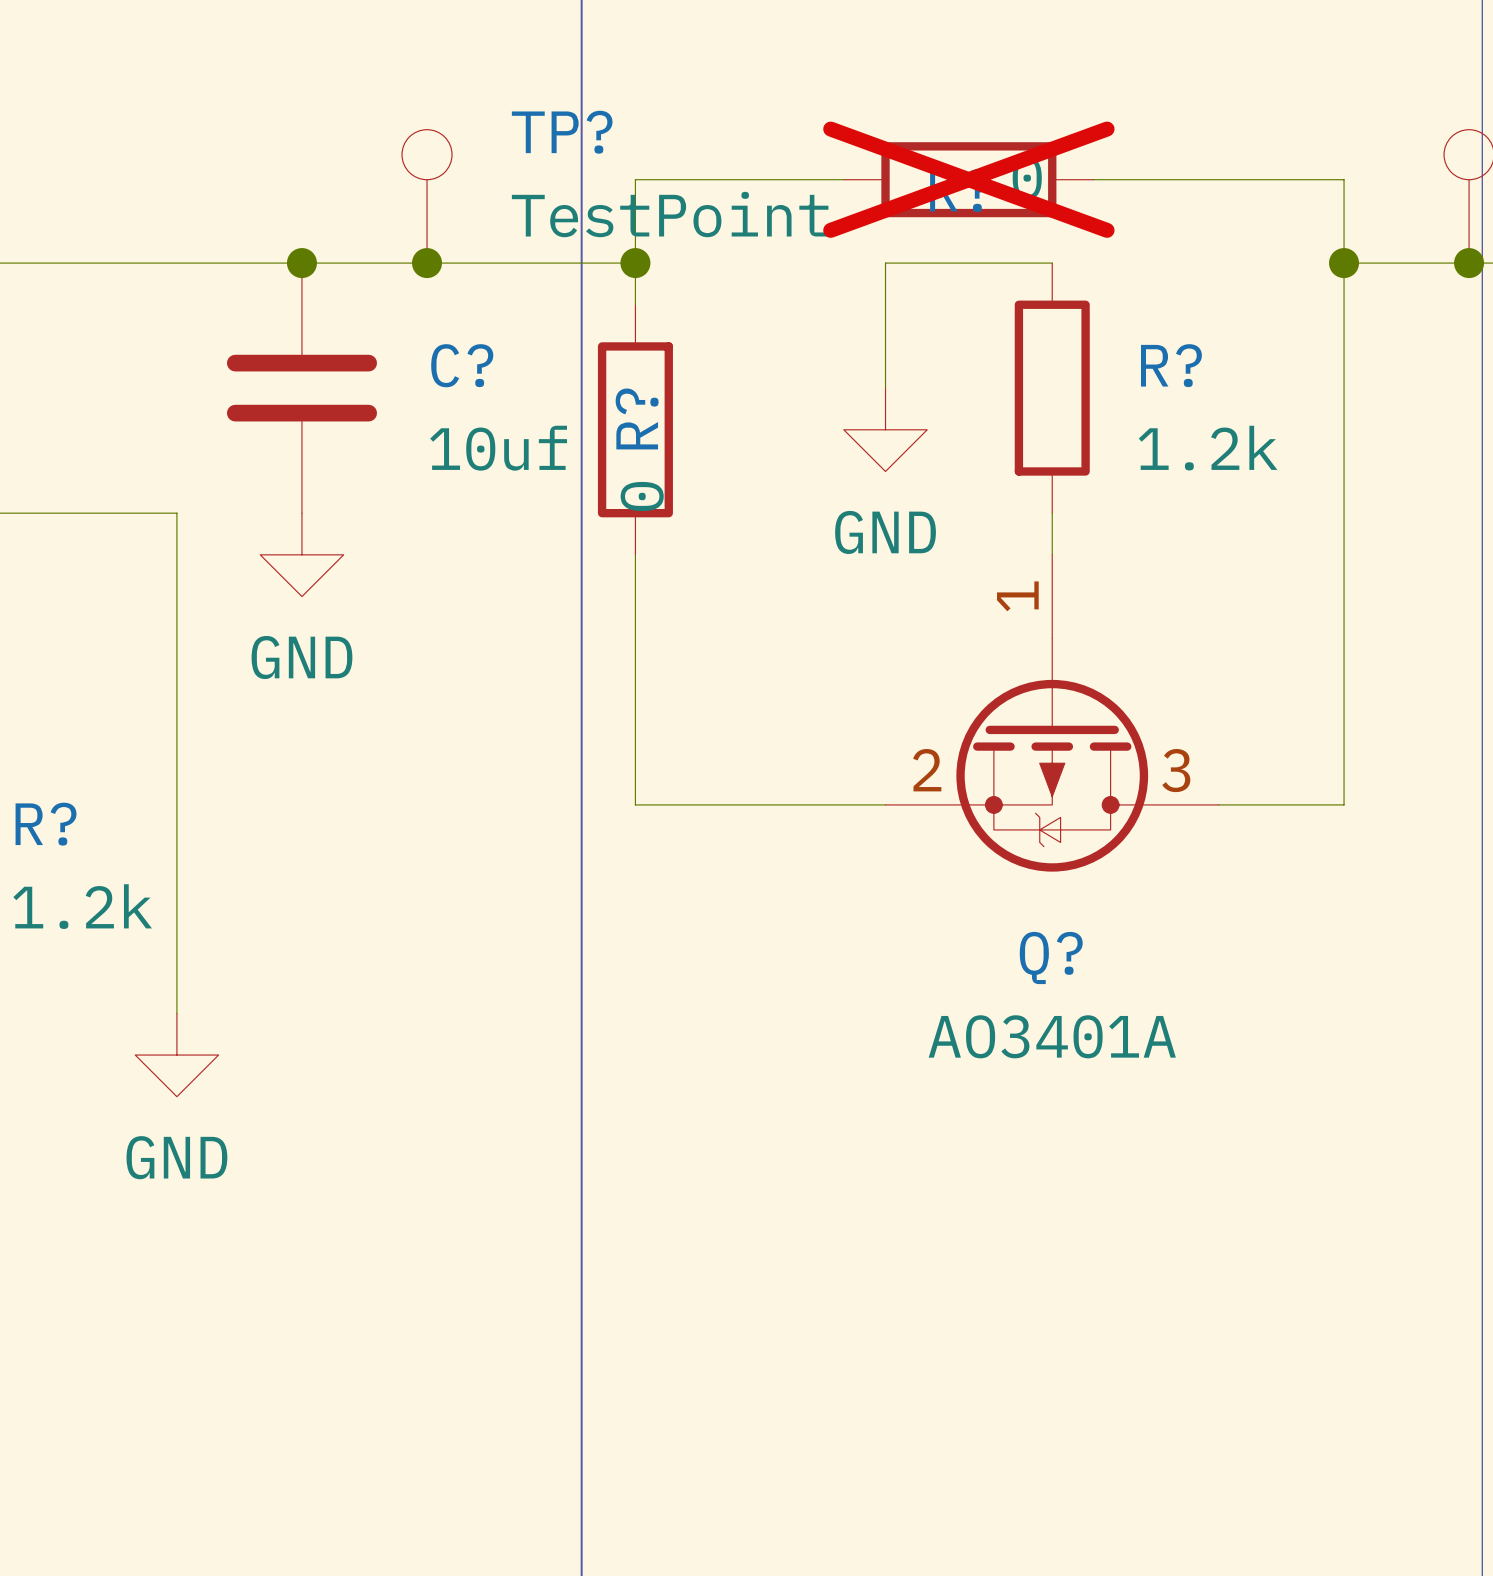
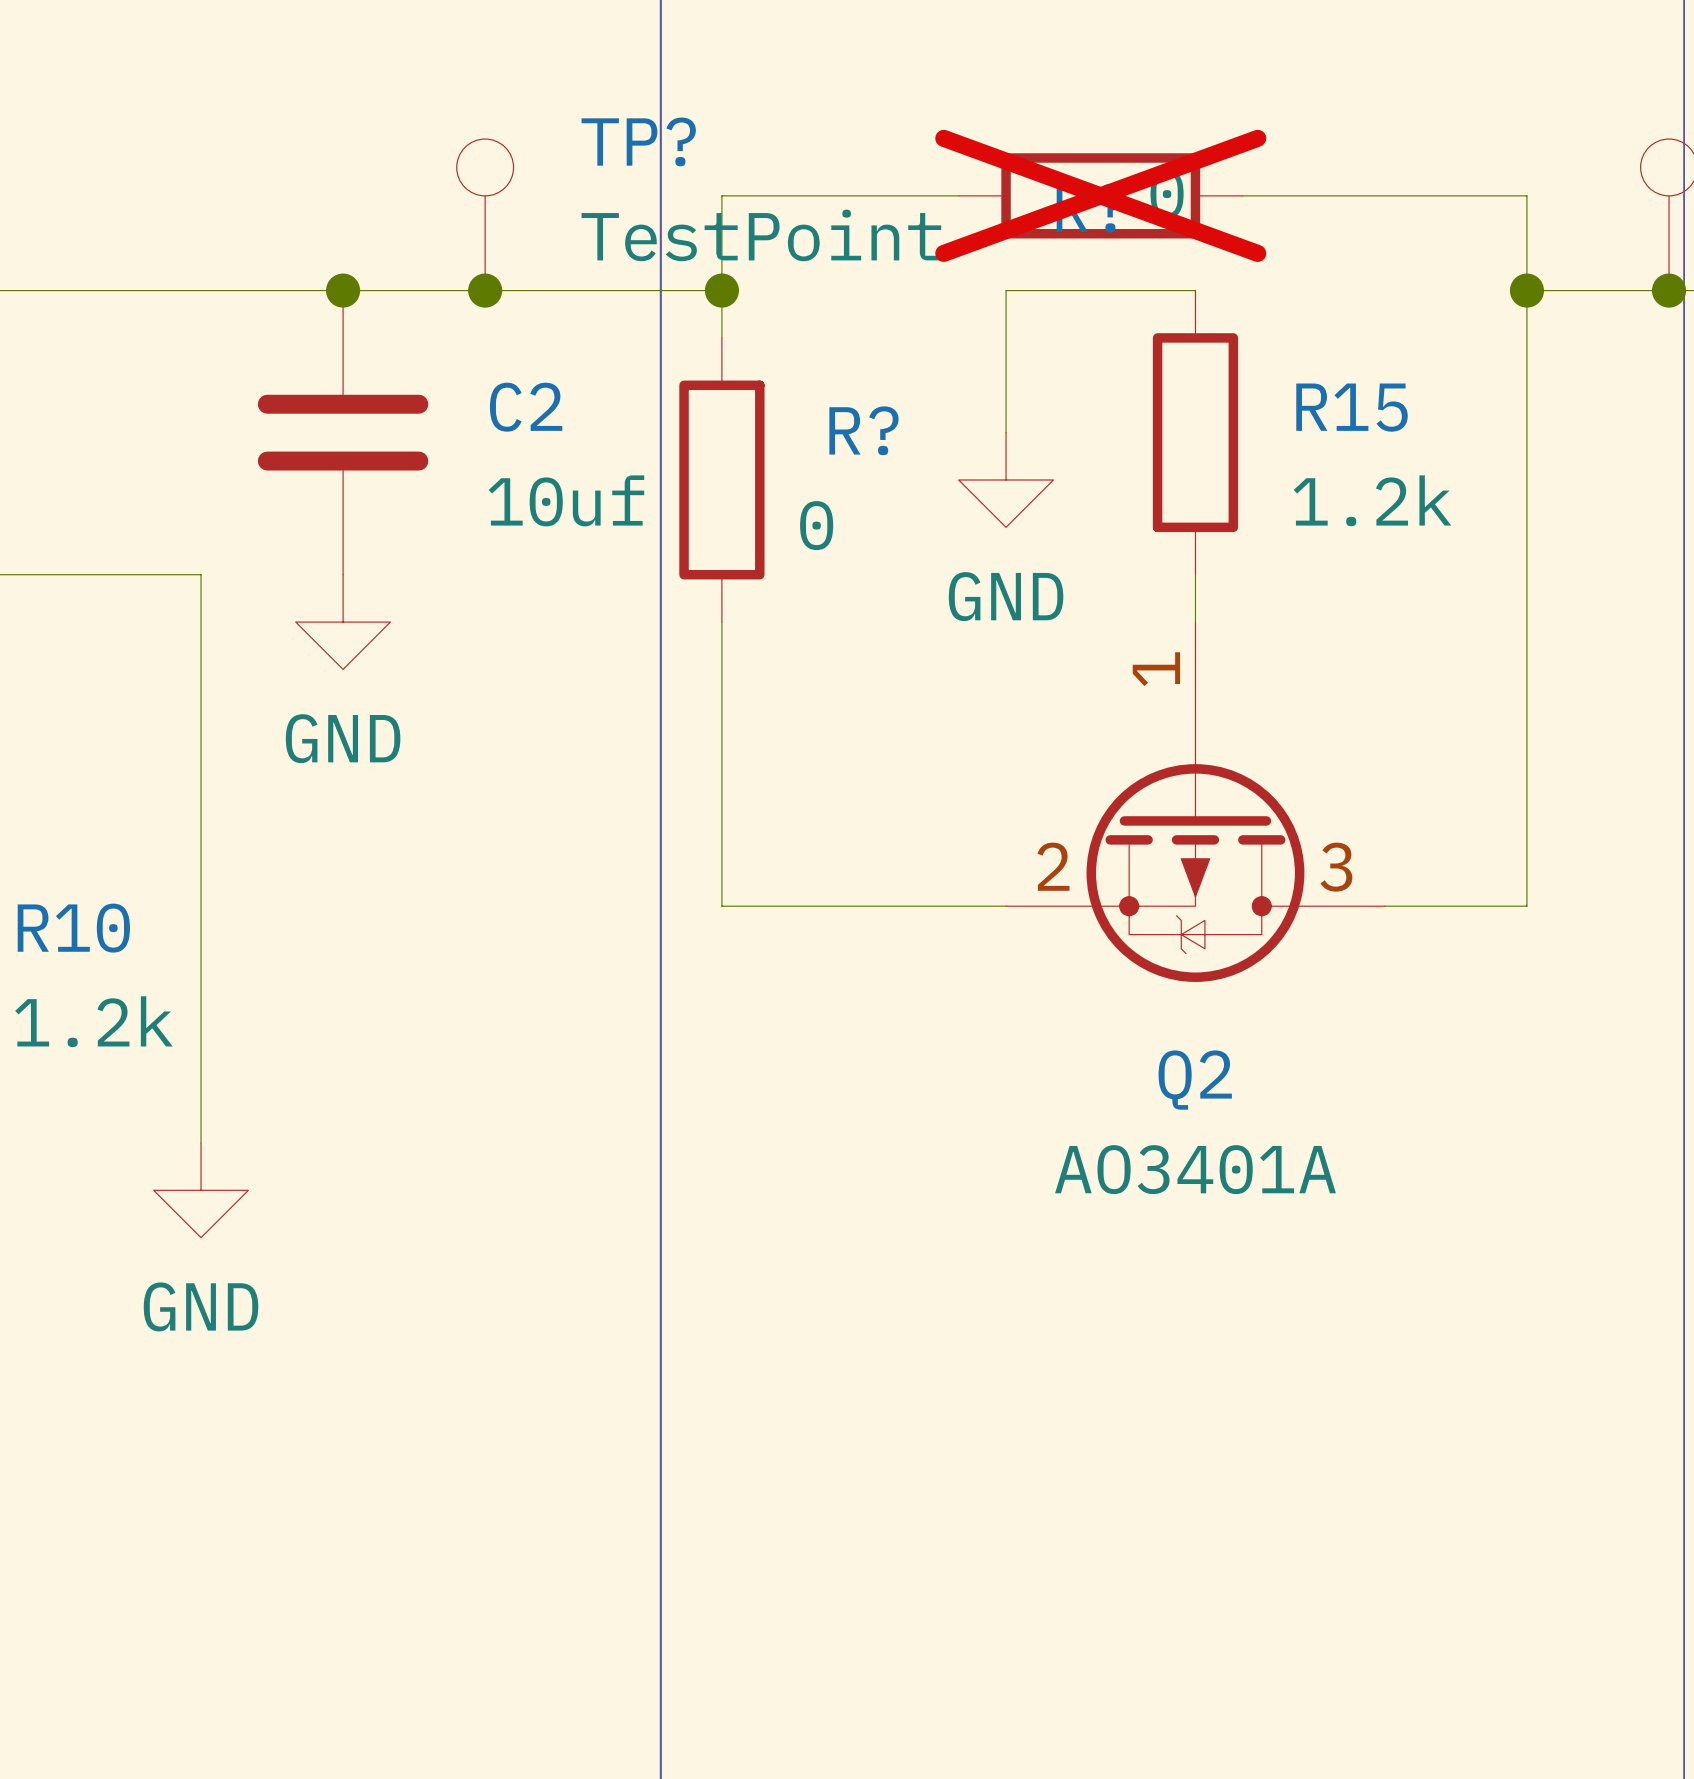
C? name: C? (462, 365) -> C2 (526, 407)
R? name: R? (1171, 365) -> R15 (1352, 407)
R? name rotation: 0° (637, 418) -> 90° clockwise (863, 430)
R? name position: R? (637, 418) -> R? (863, 430)
R? value rotation: 0° (642, 496) -> 90° clockwise (816, 525)
R? name: R? (46, 824) -> R10 (73, 928)
Q? name: Q? (1051, 957) -> Q2 (1195, 1080)

